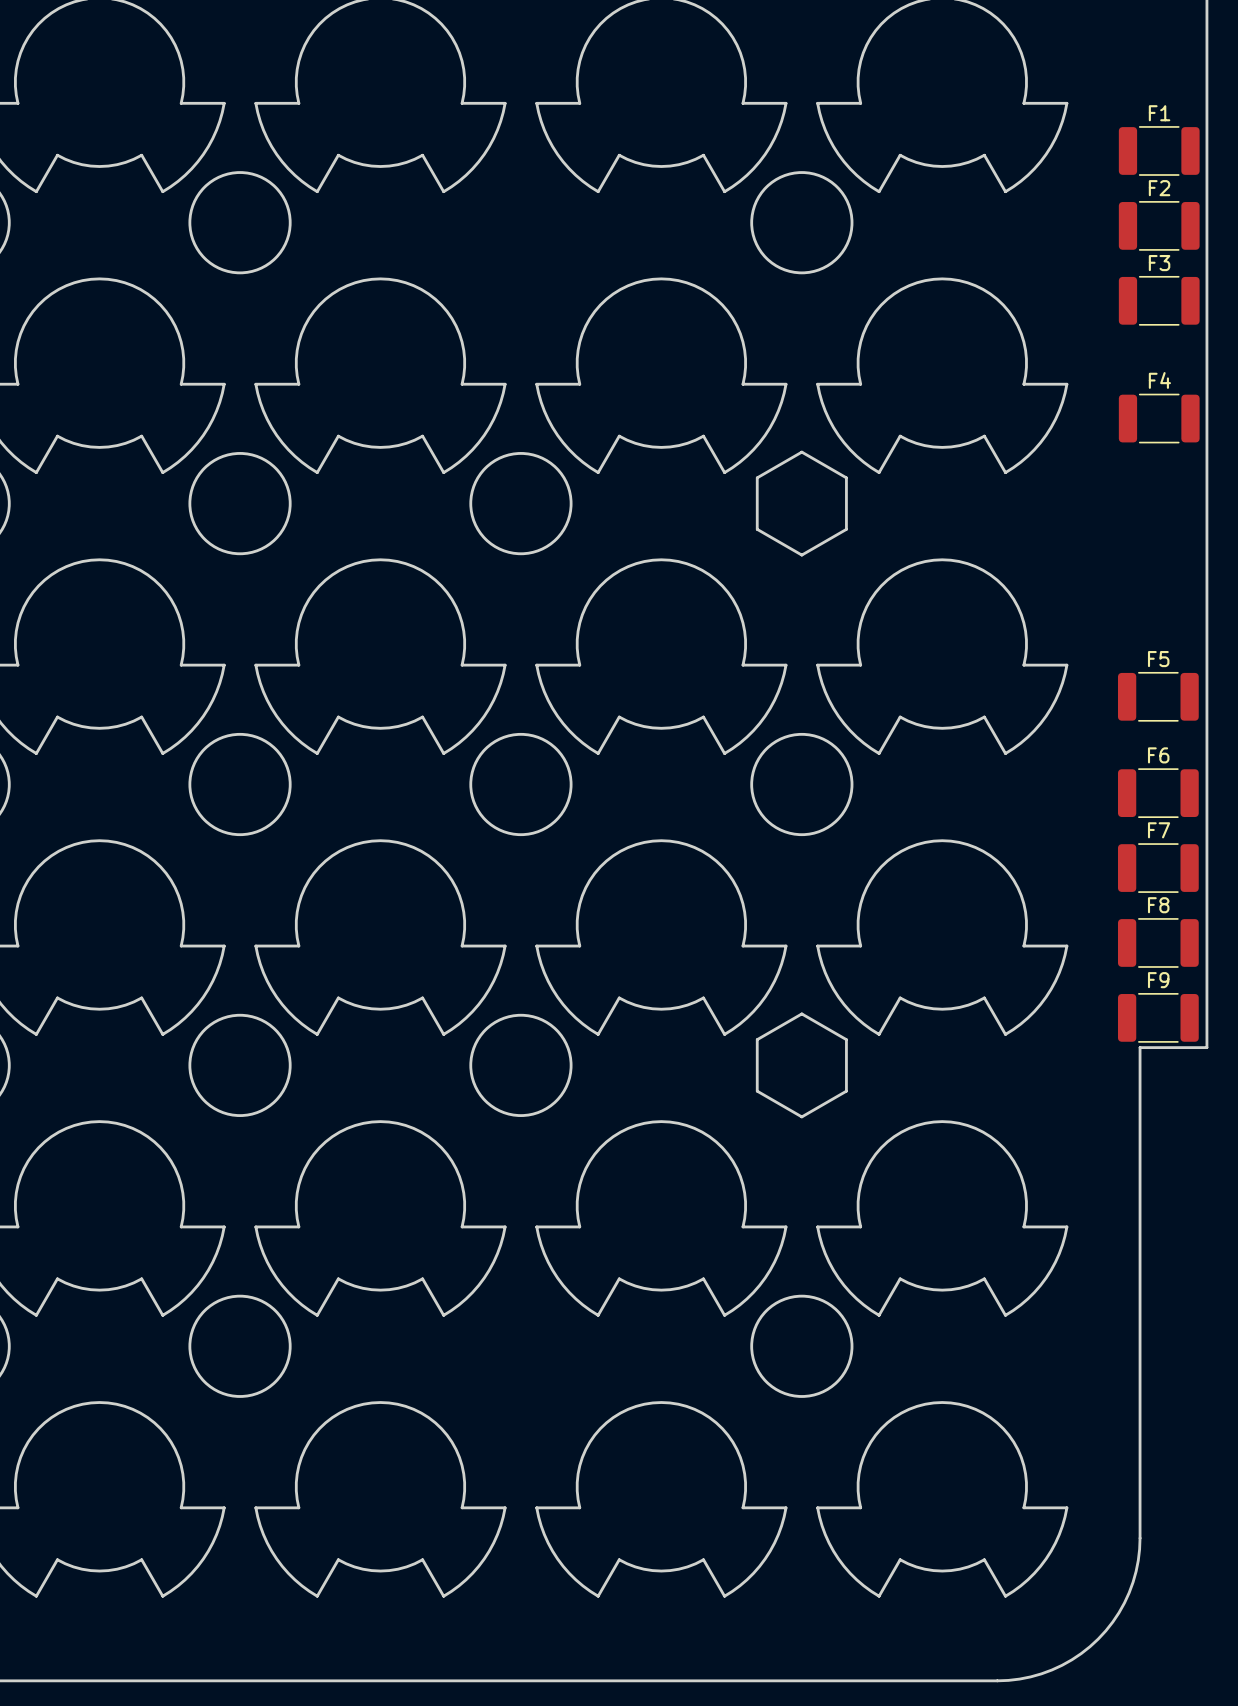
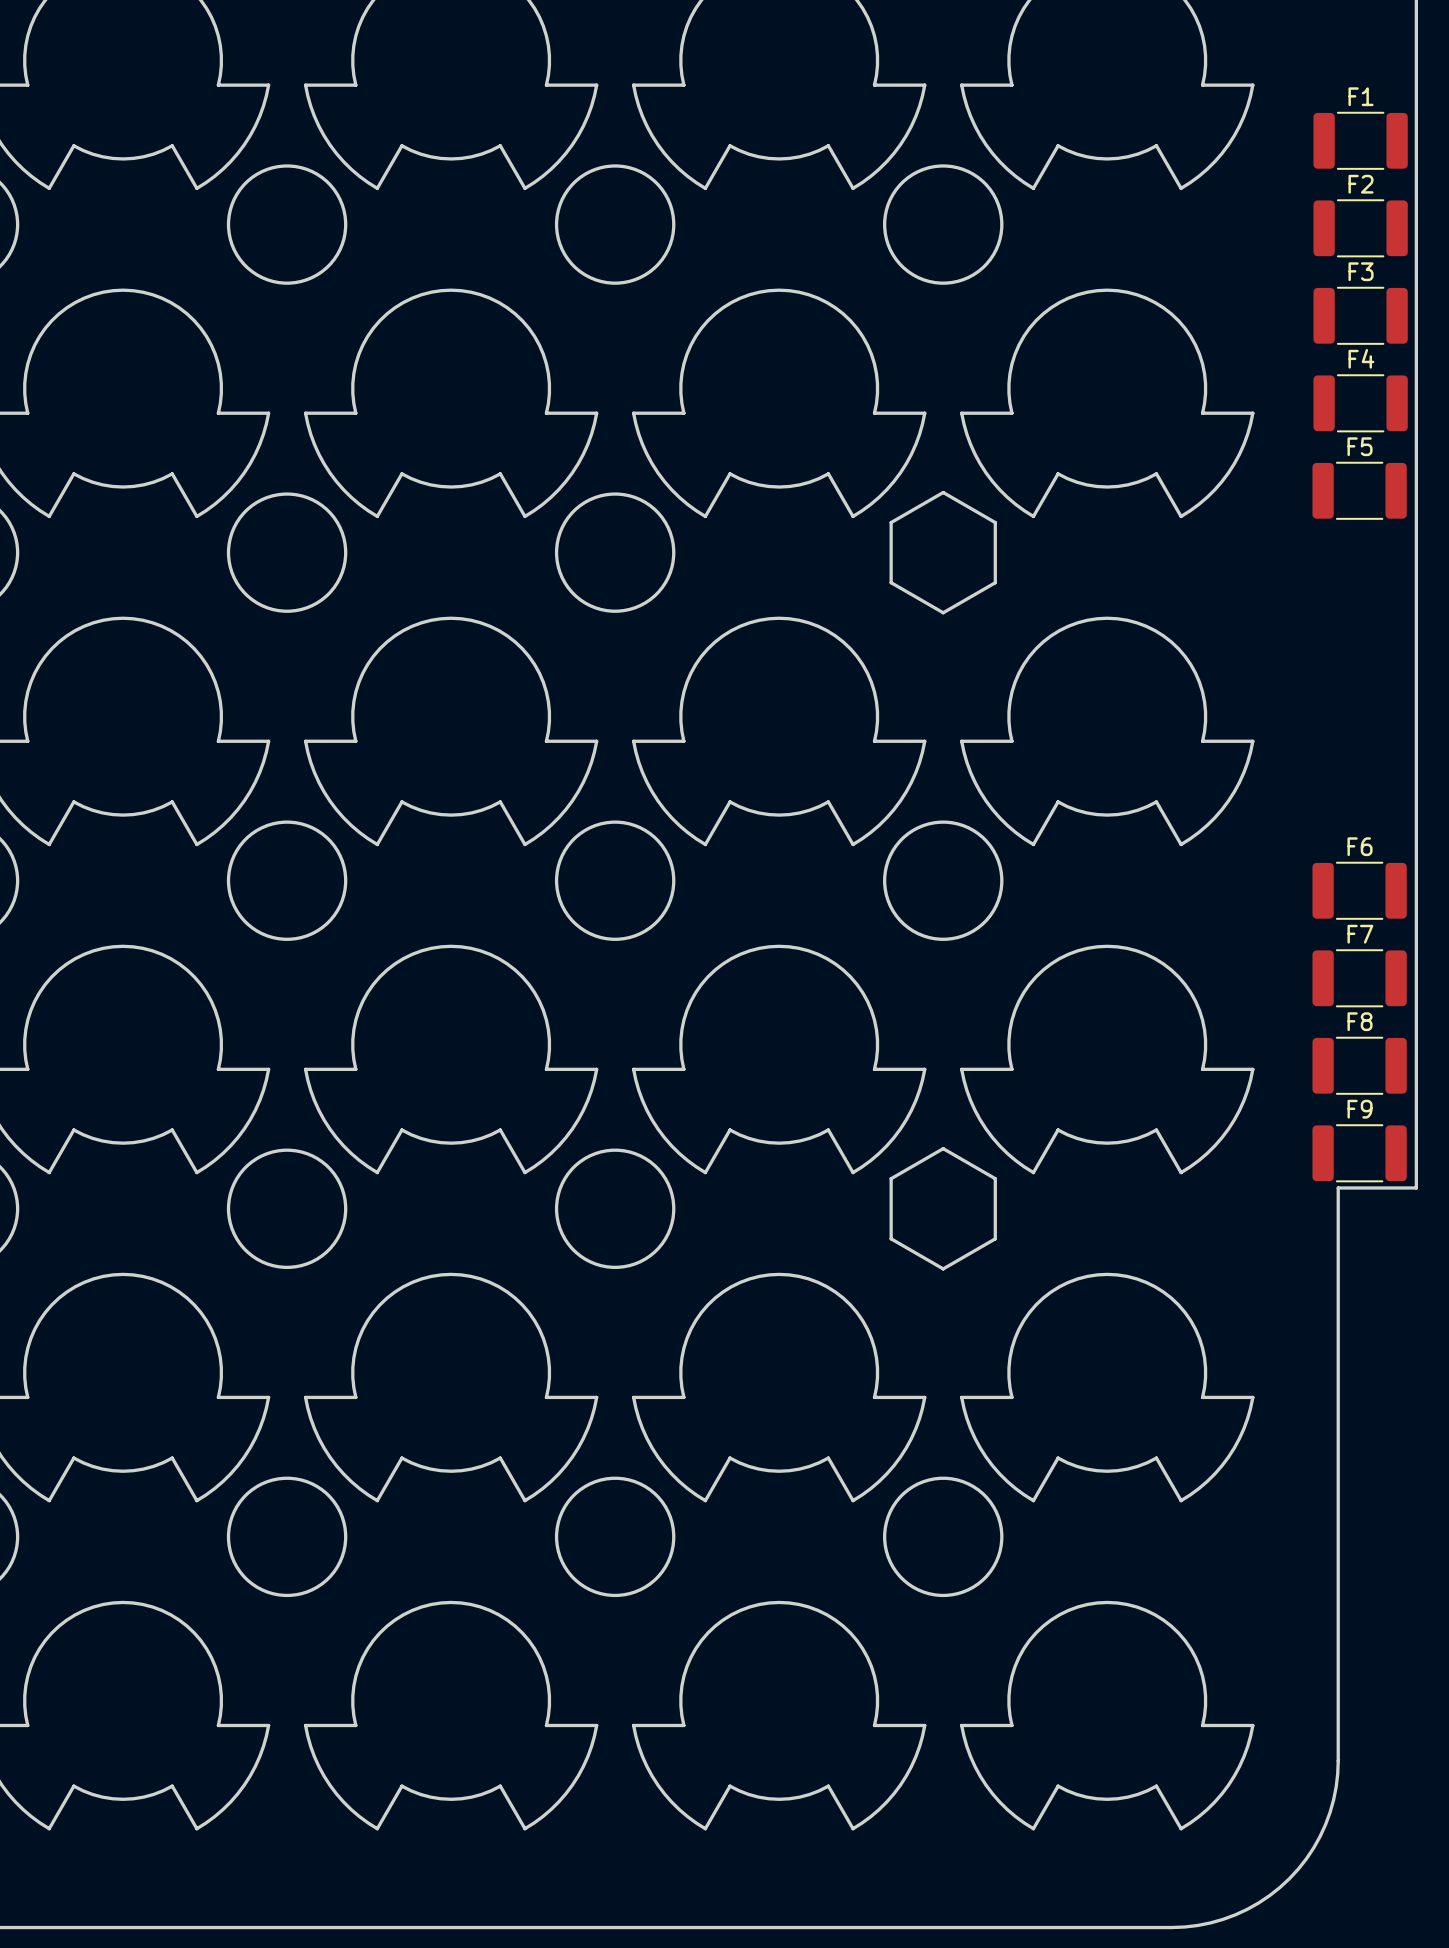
round board edge: none -> [554, 164, 676, 285]
F4 position: (1159, 418) -> (1360, 403)
F5 position: (1158, 696) -> (1359, 490)
round board edge: none -> [554, 1476, 676, 1598]

